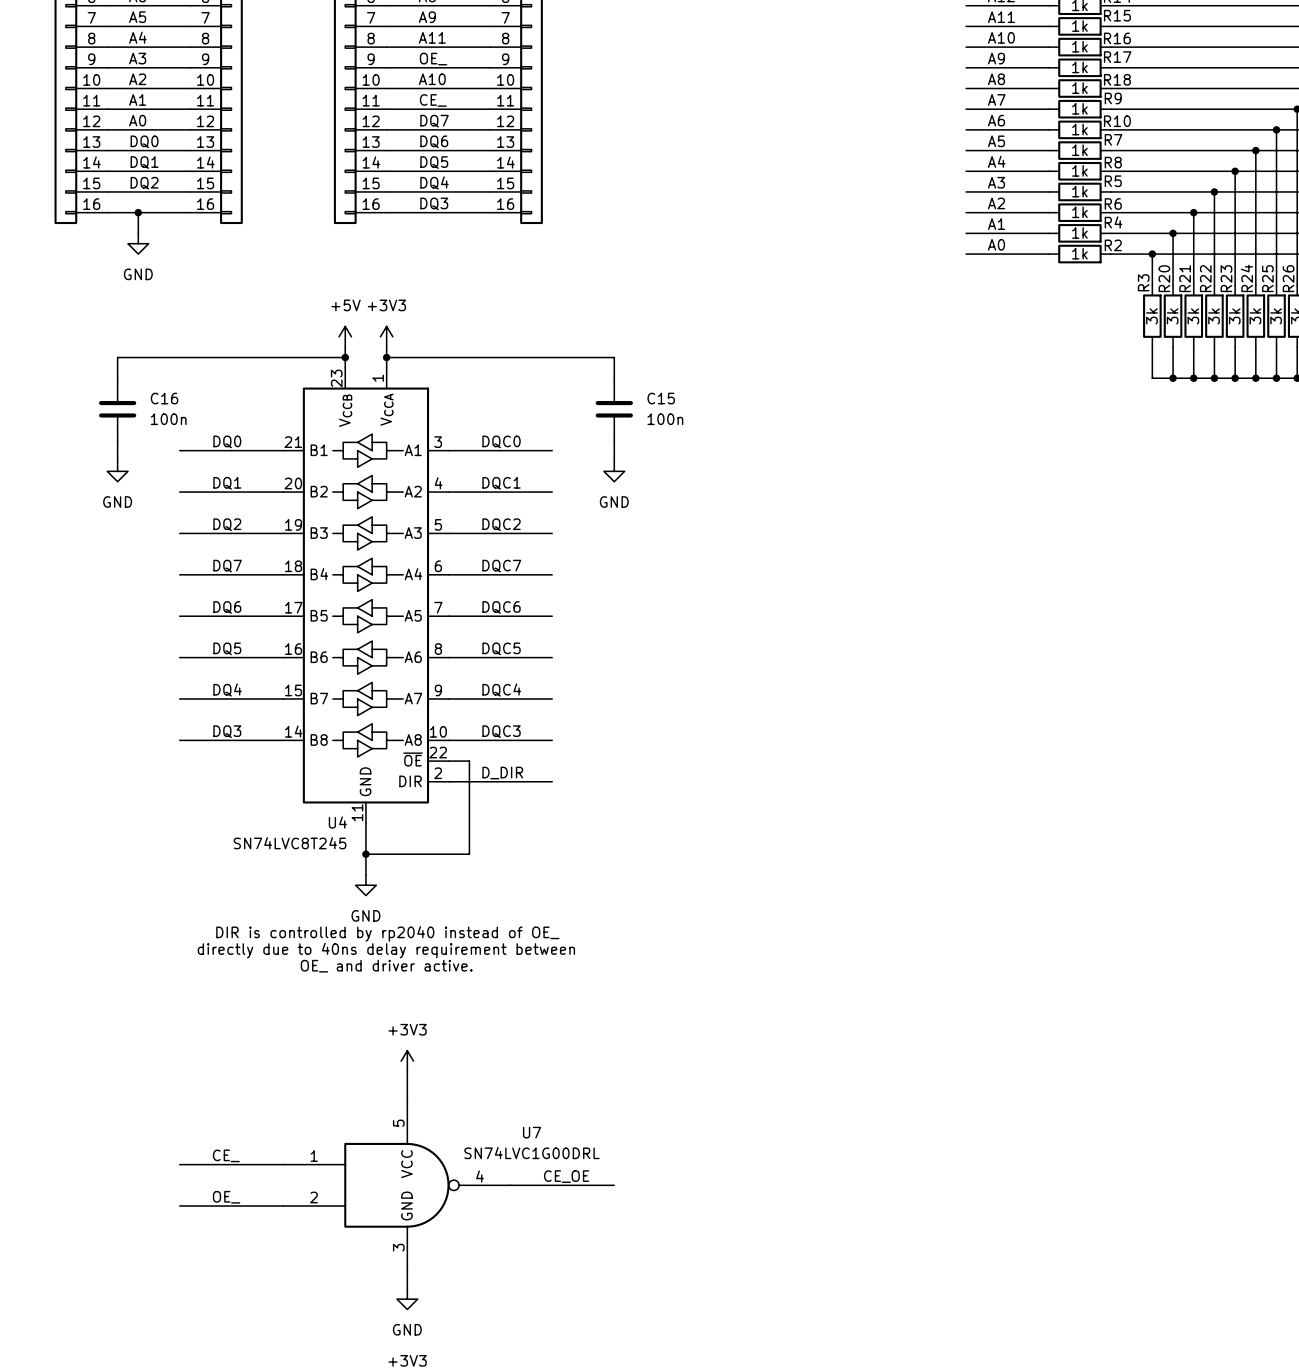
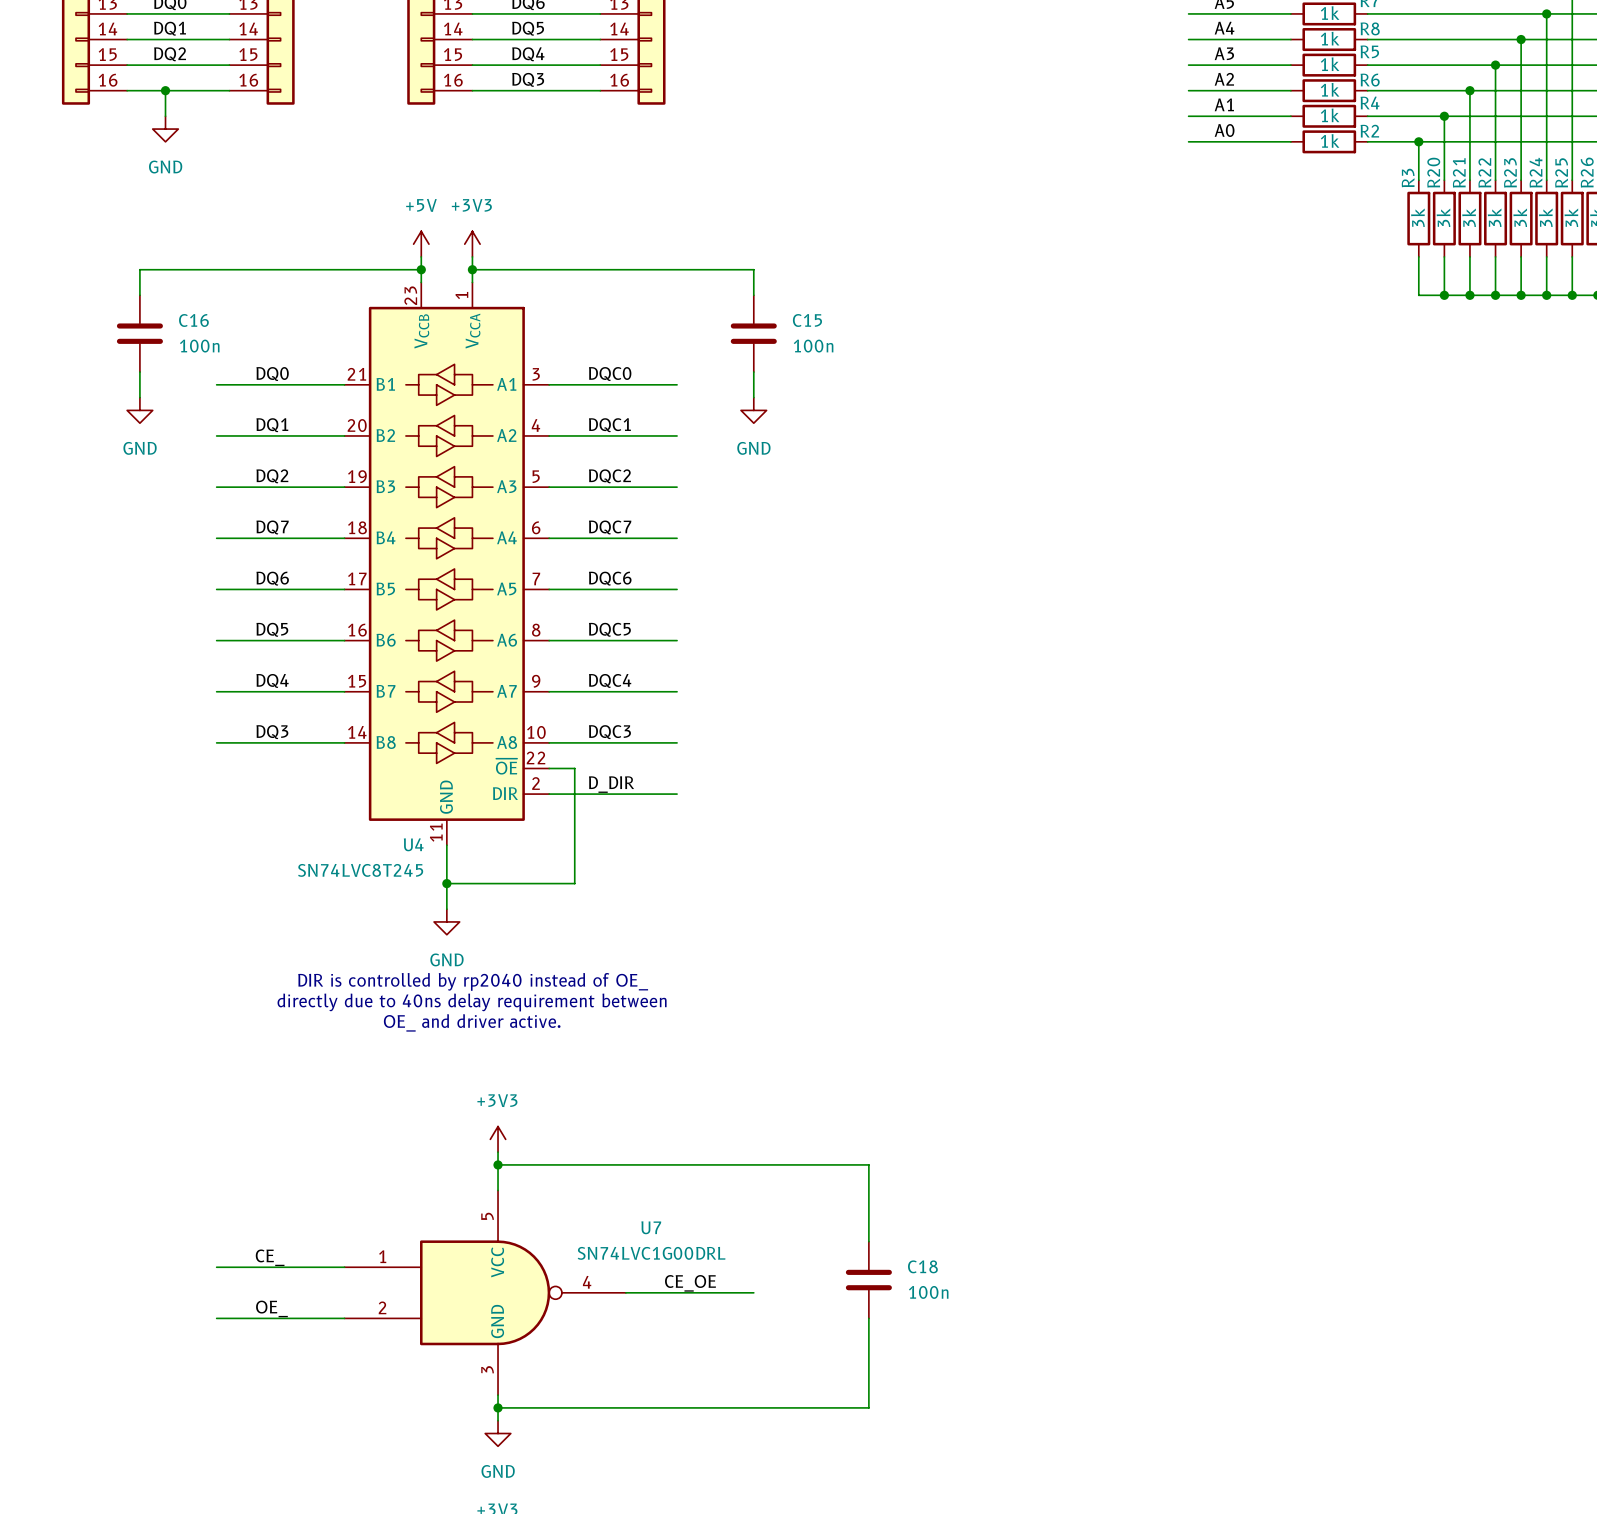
wire: none -> (498, 1164) (868, 1164) (868, 1241)
junction: none -> (498, 1164)
C18: none -> 100n (868, 1280)
wire: none -> (868, 1318) (868, 1407) (498, 1407)
junction: none -> (498, 1407)

